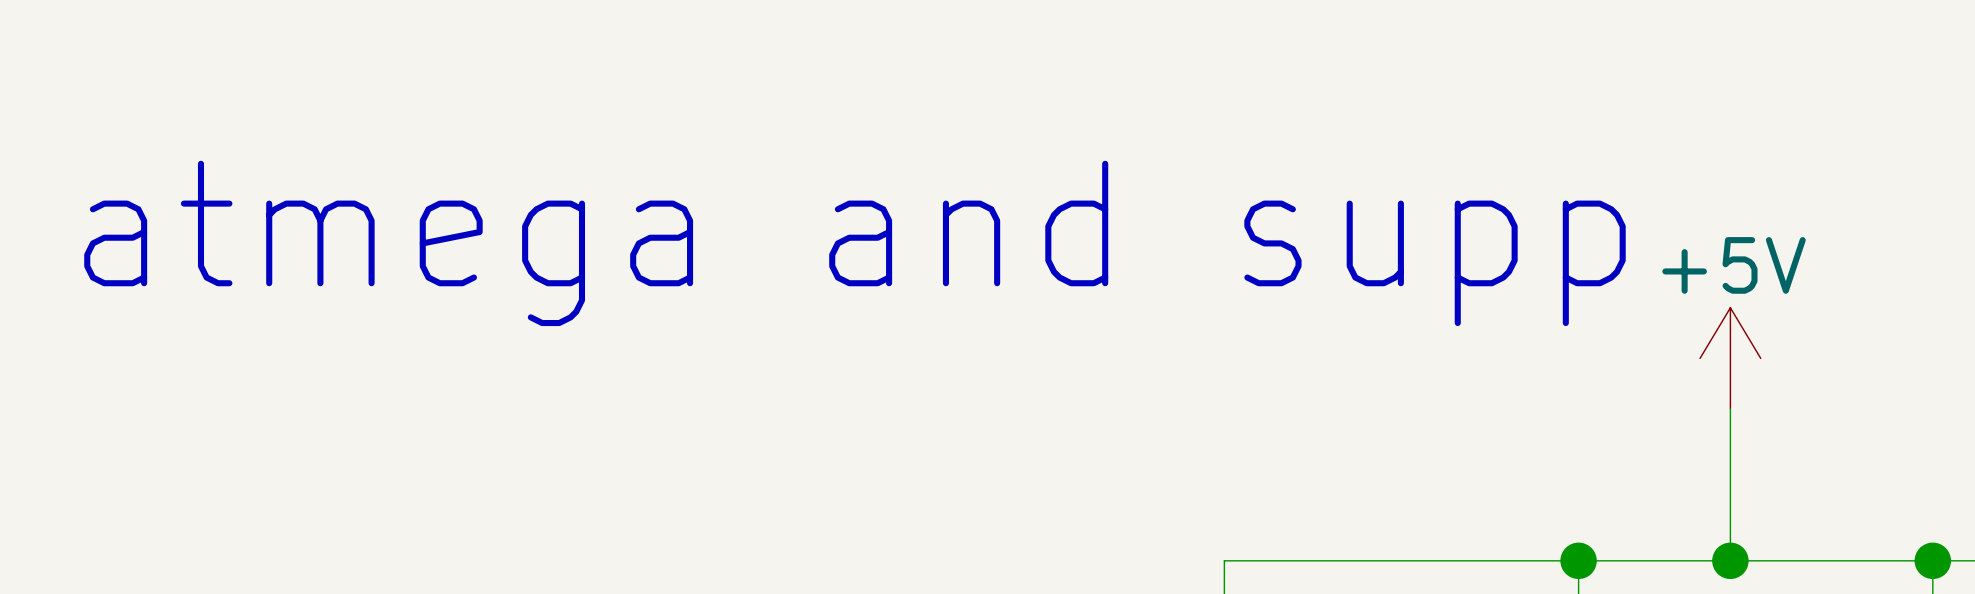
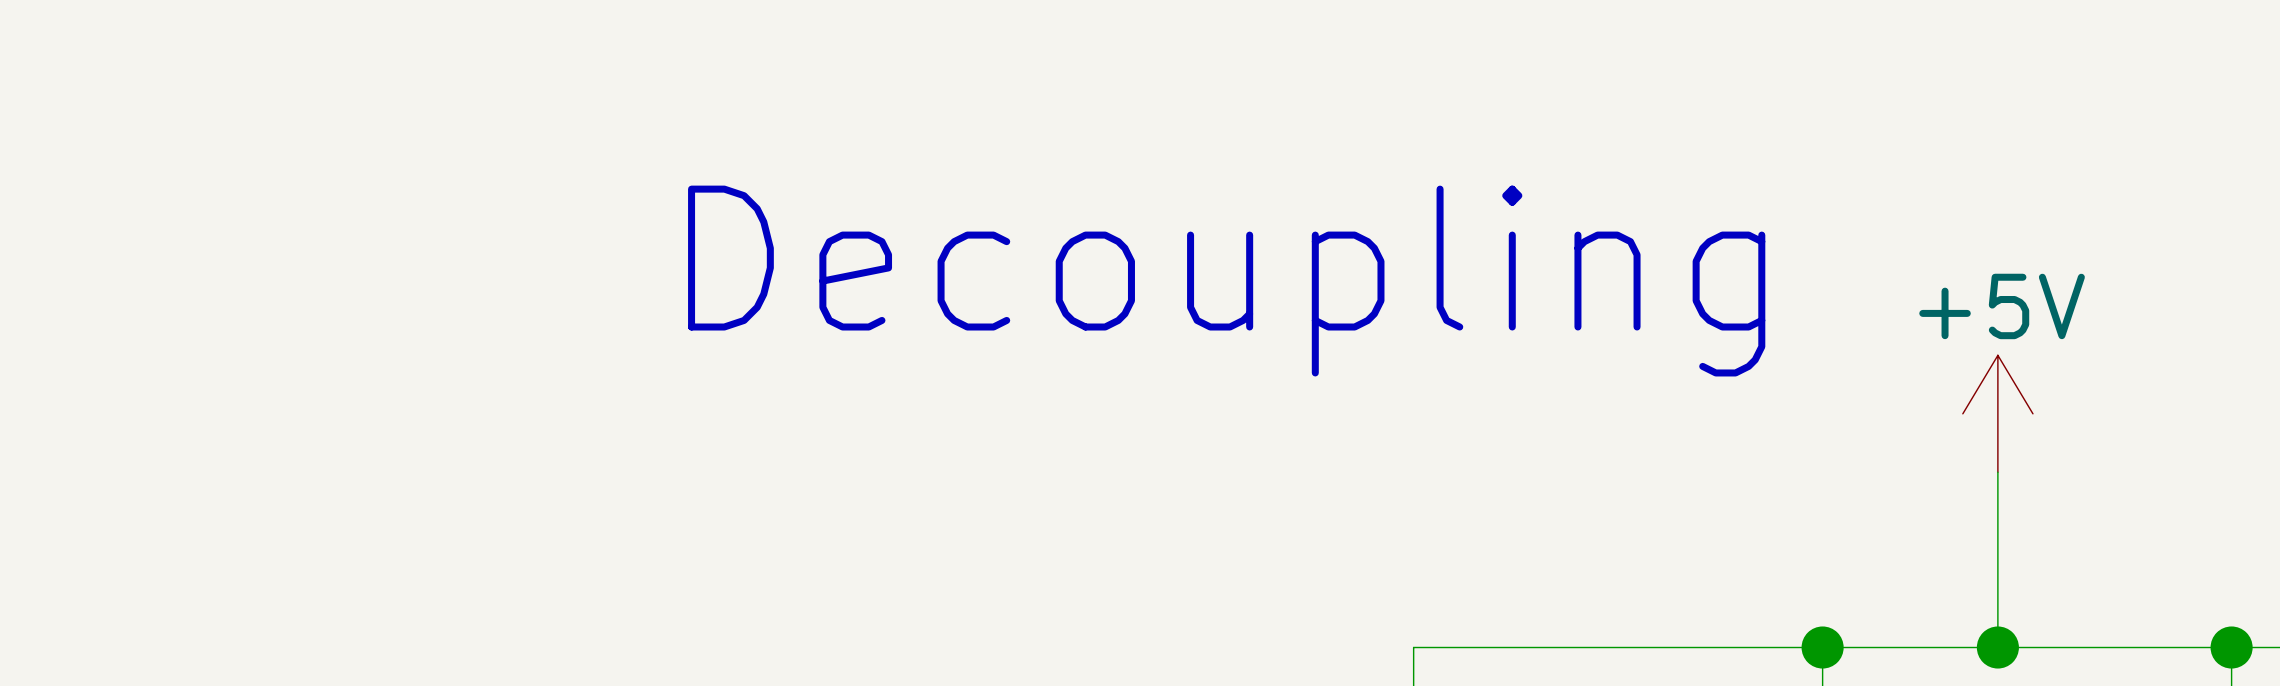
text: atmega and supp (854, 243) -> none
text: none -> Decoupling (1226, 281)

